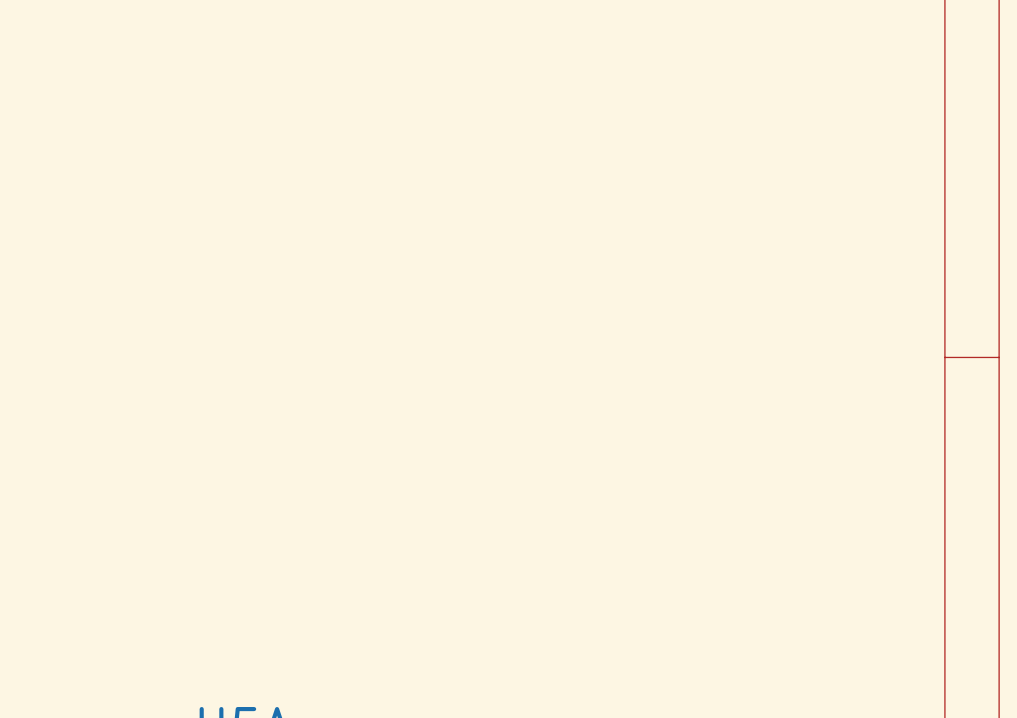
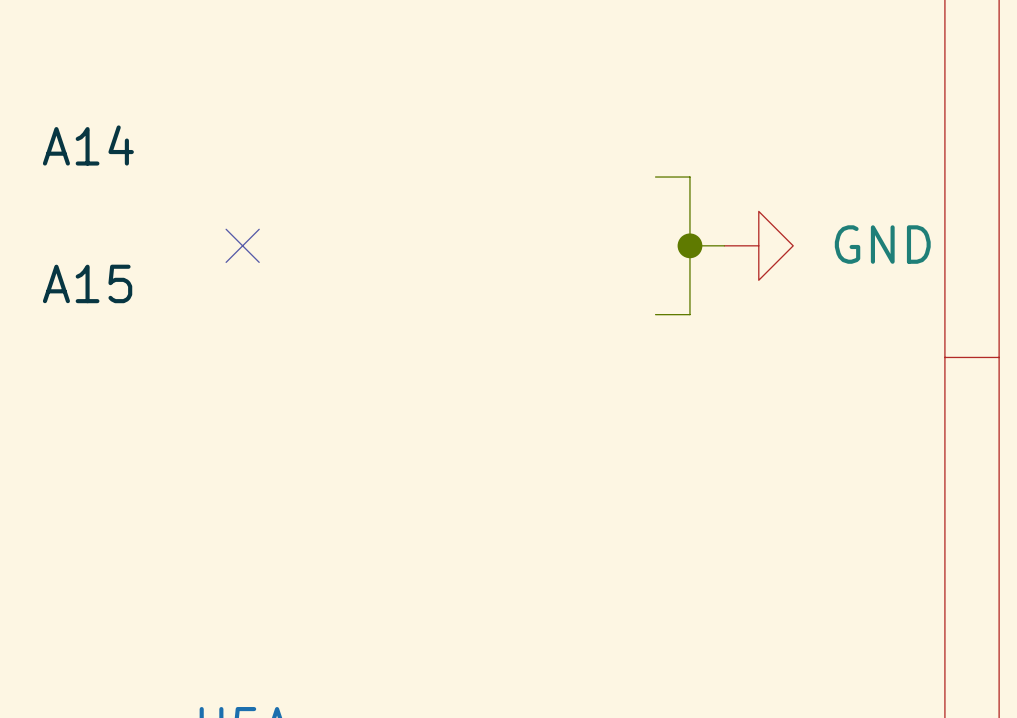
label: none -> A14 (88, 145)
wire: none -> (655, 177) (689, 177) (689, 314) (655, 314)
no-connect mark: none -> (242, 245)
wire: none -> (689, 245) (724, 245)
junction: none -> (689, 245)
power symbol: none -> GND (758, 245)
label: none -> A15 (87, 283)

